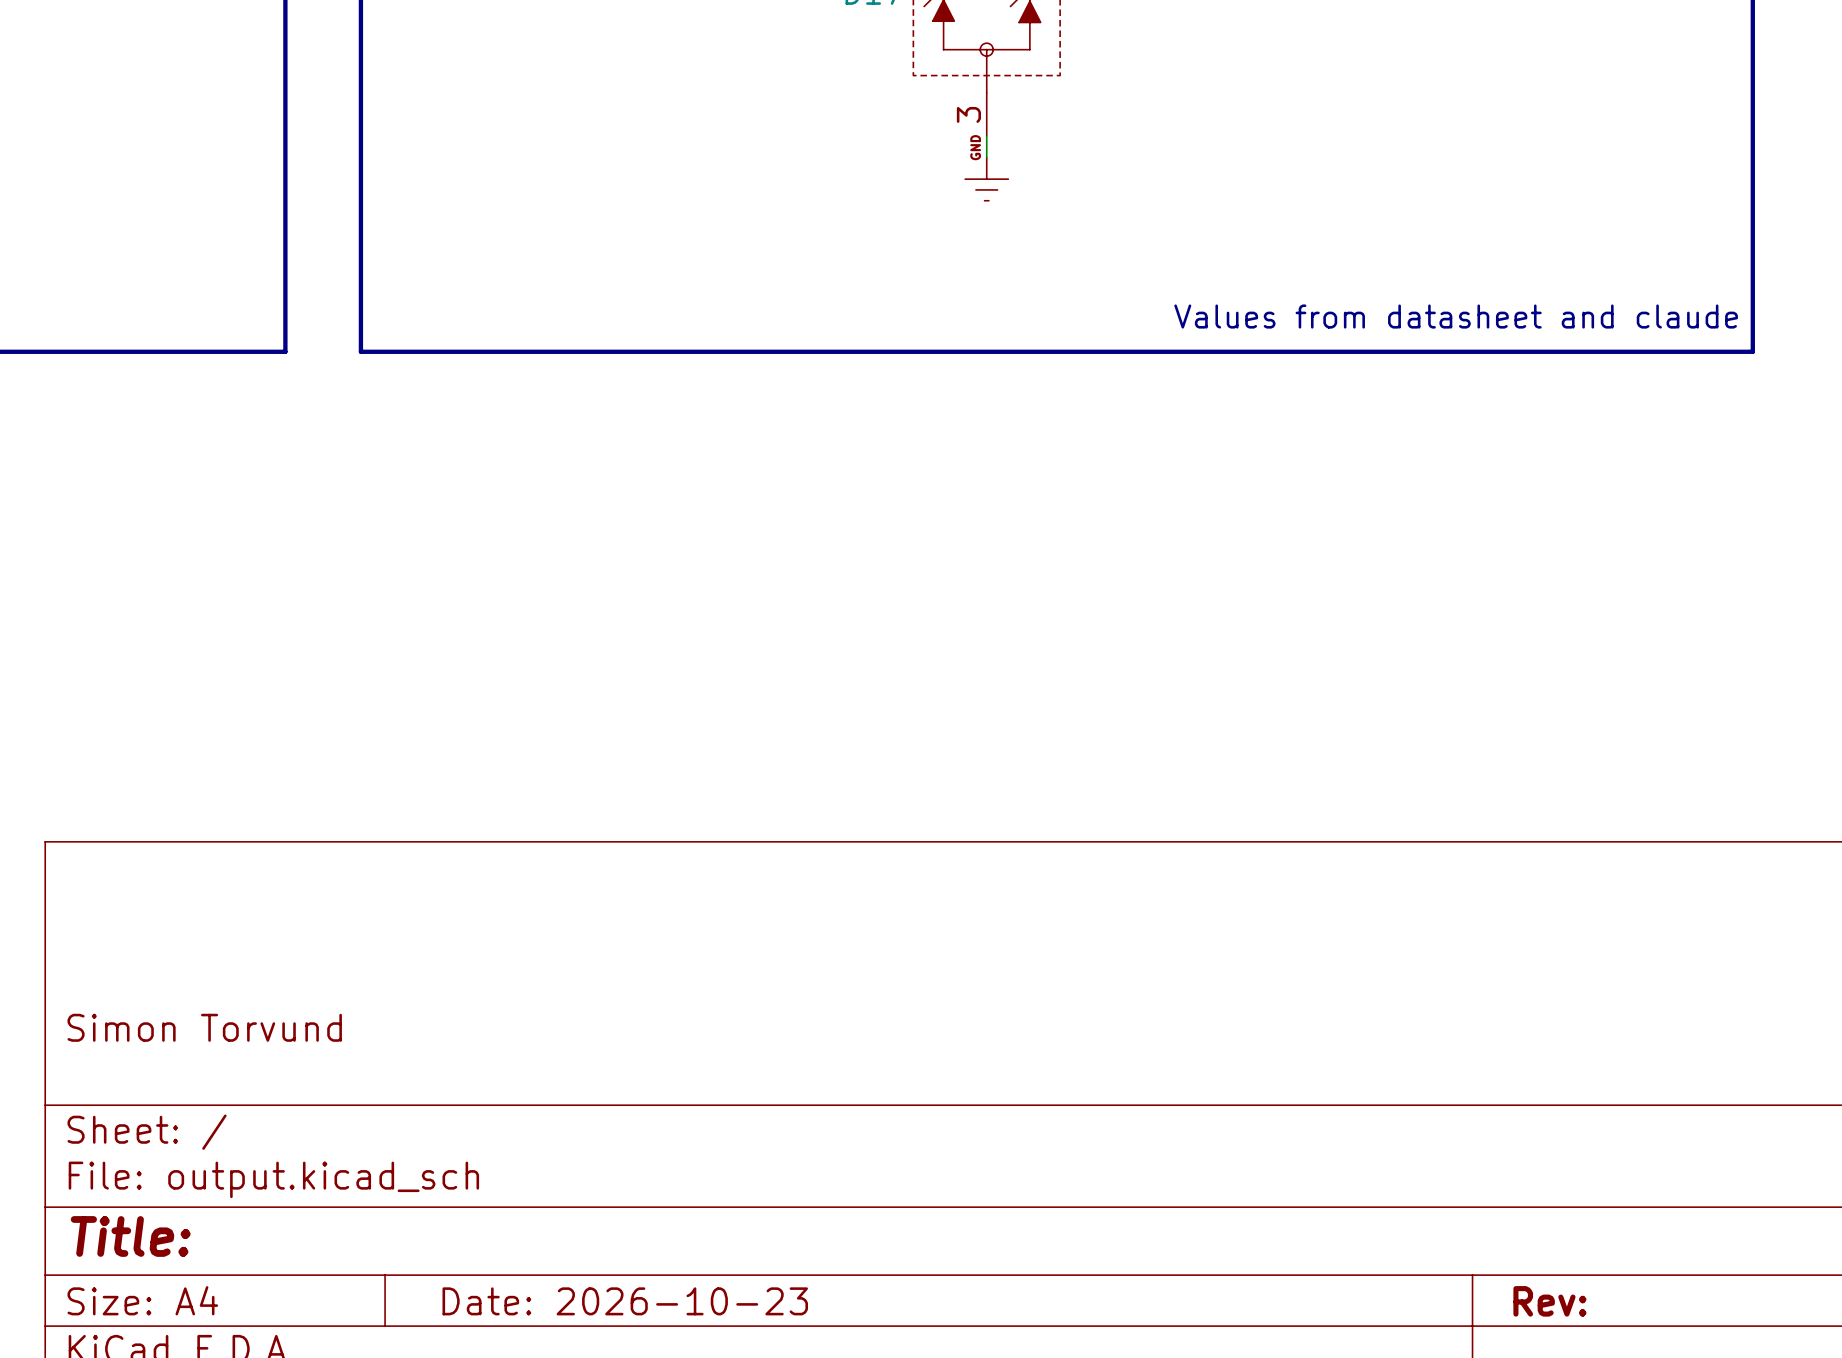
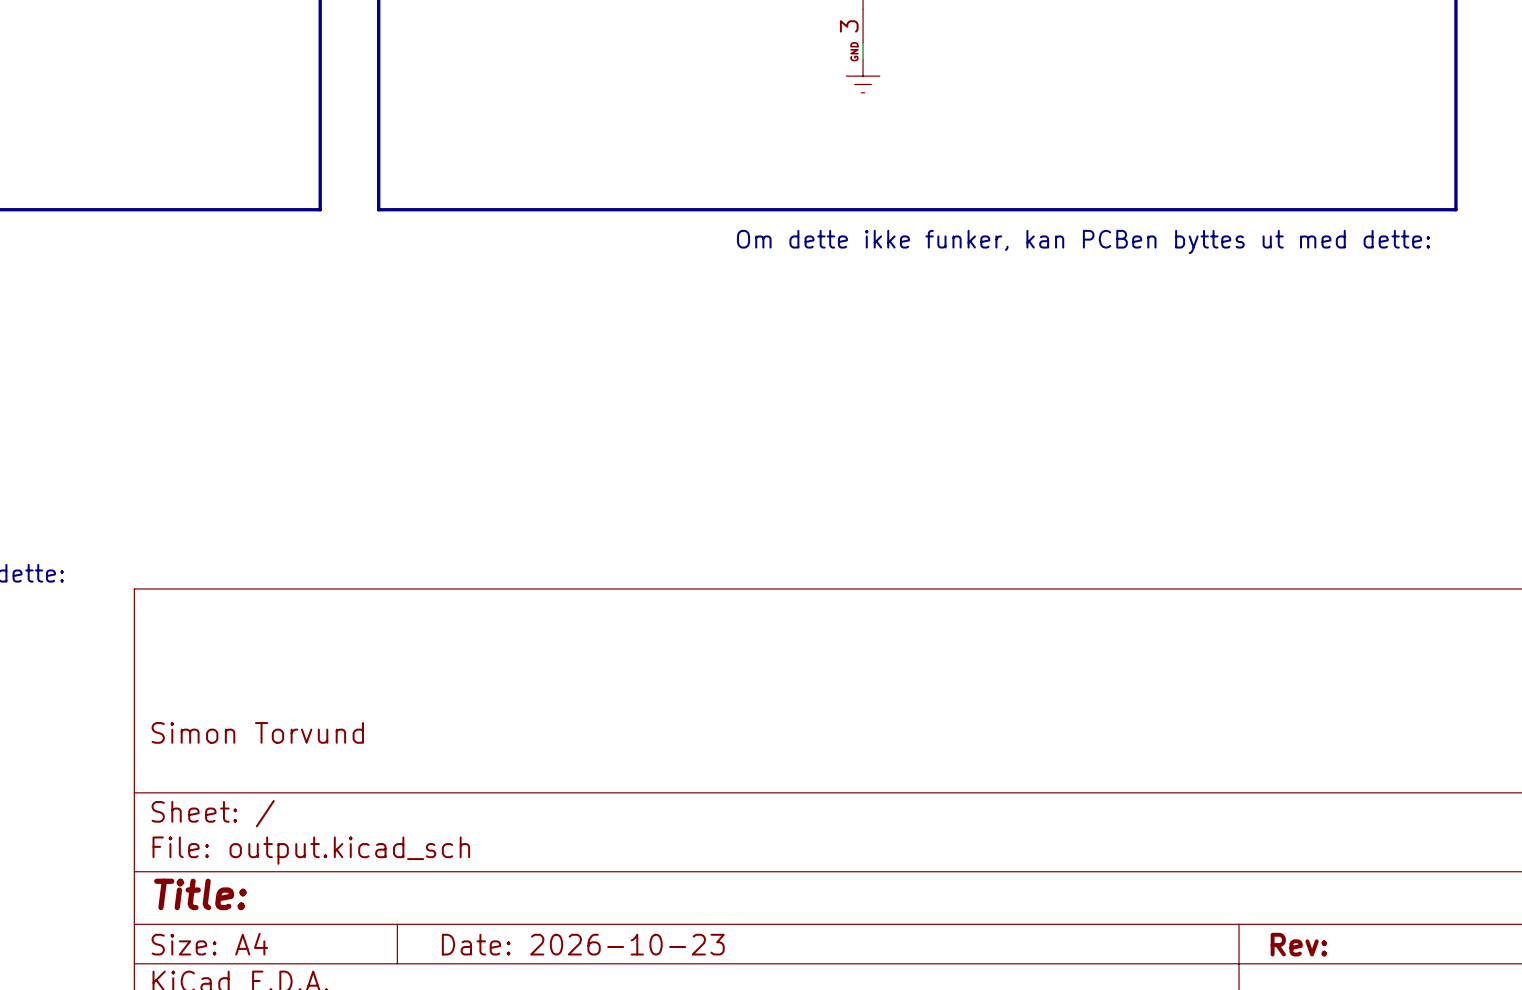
text: Values from datasheet and claude (1456, 316) -> none
text: none -> Om dette ikke funker, kan PCBen byttes ut med dette: (1083, 241)

